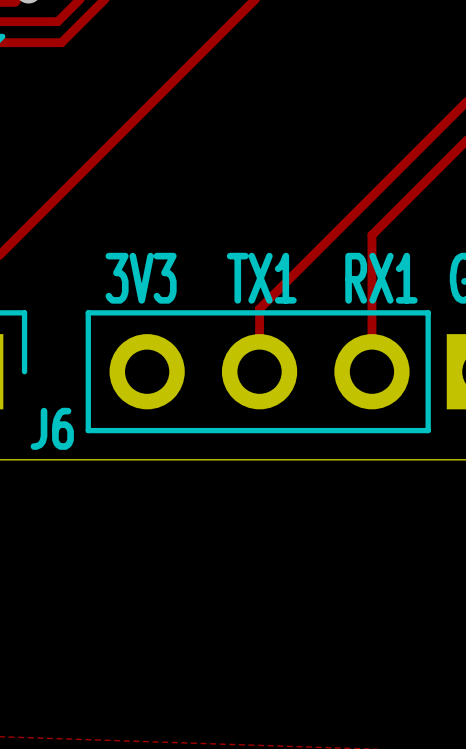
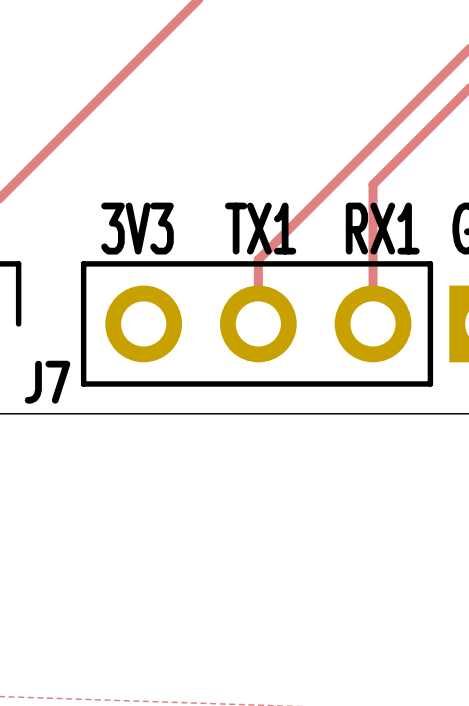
J6 name: J6 (52, 428) -> J7 (47, 382)

